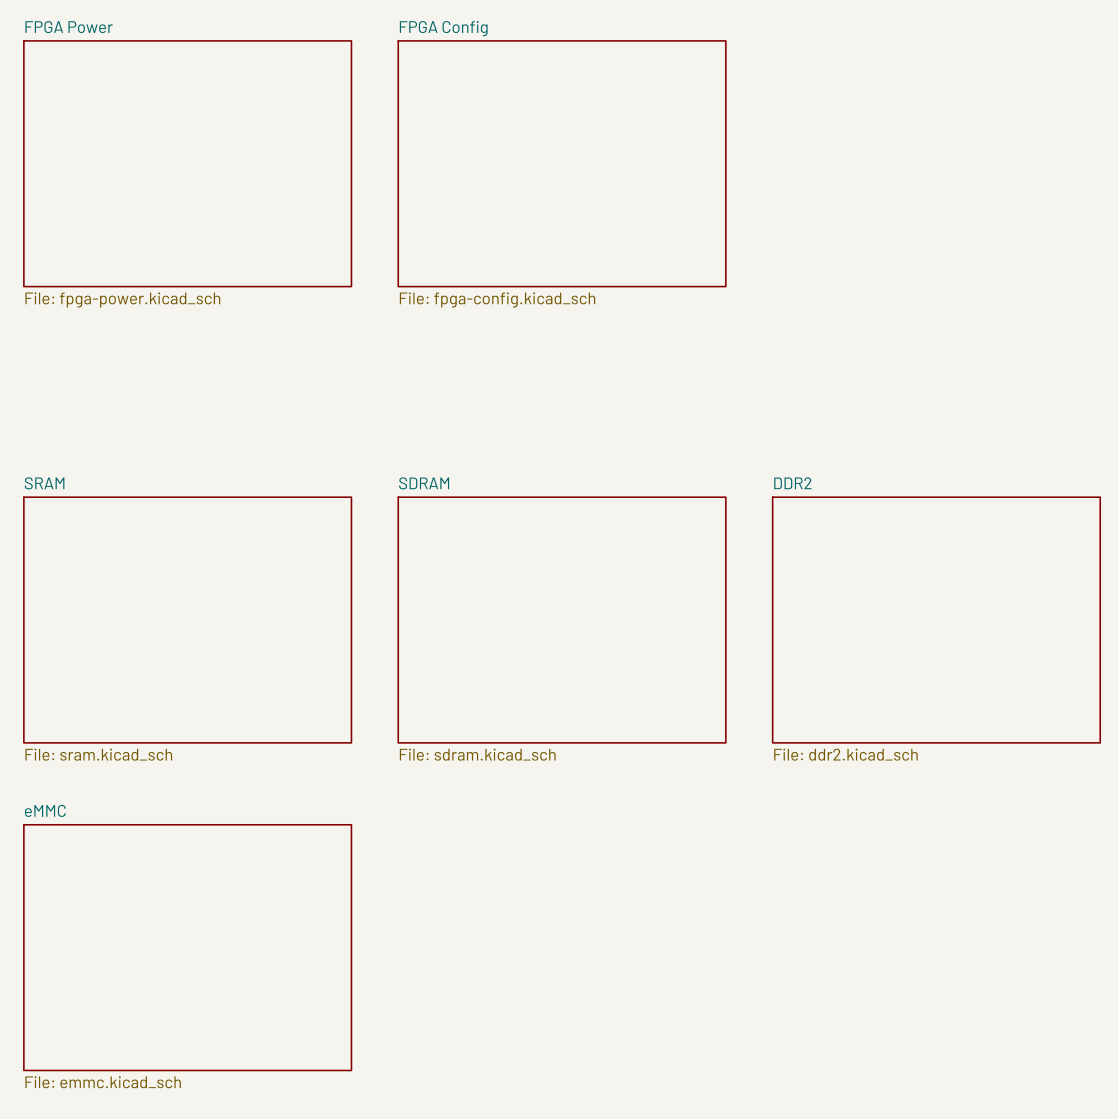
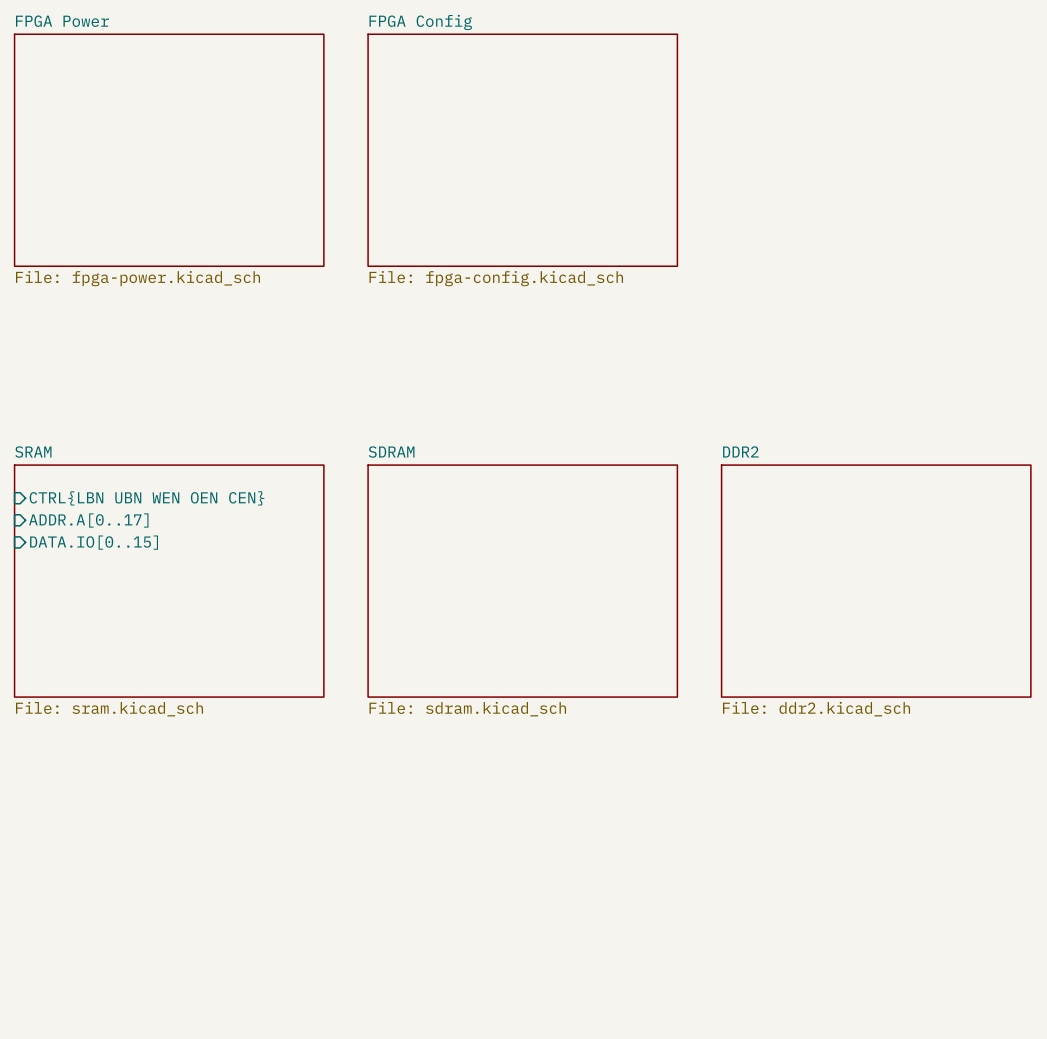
sheet pin: none -> CTRL{LBN UBN WEN OEN CEN} (147, 498)
sheet pin: none -> ADDR.A[0..17] (88, 520)
sheet pin: none -> DATA.IO[0..15] (94, 542)
sheet eMMC: File: emmc.kicad_sch (187, 947) -> none

